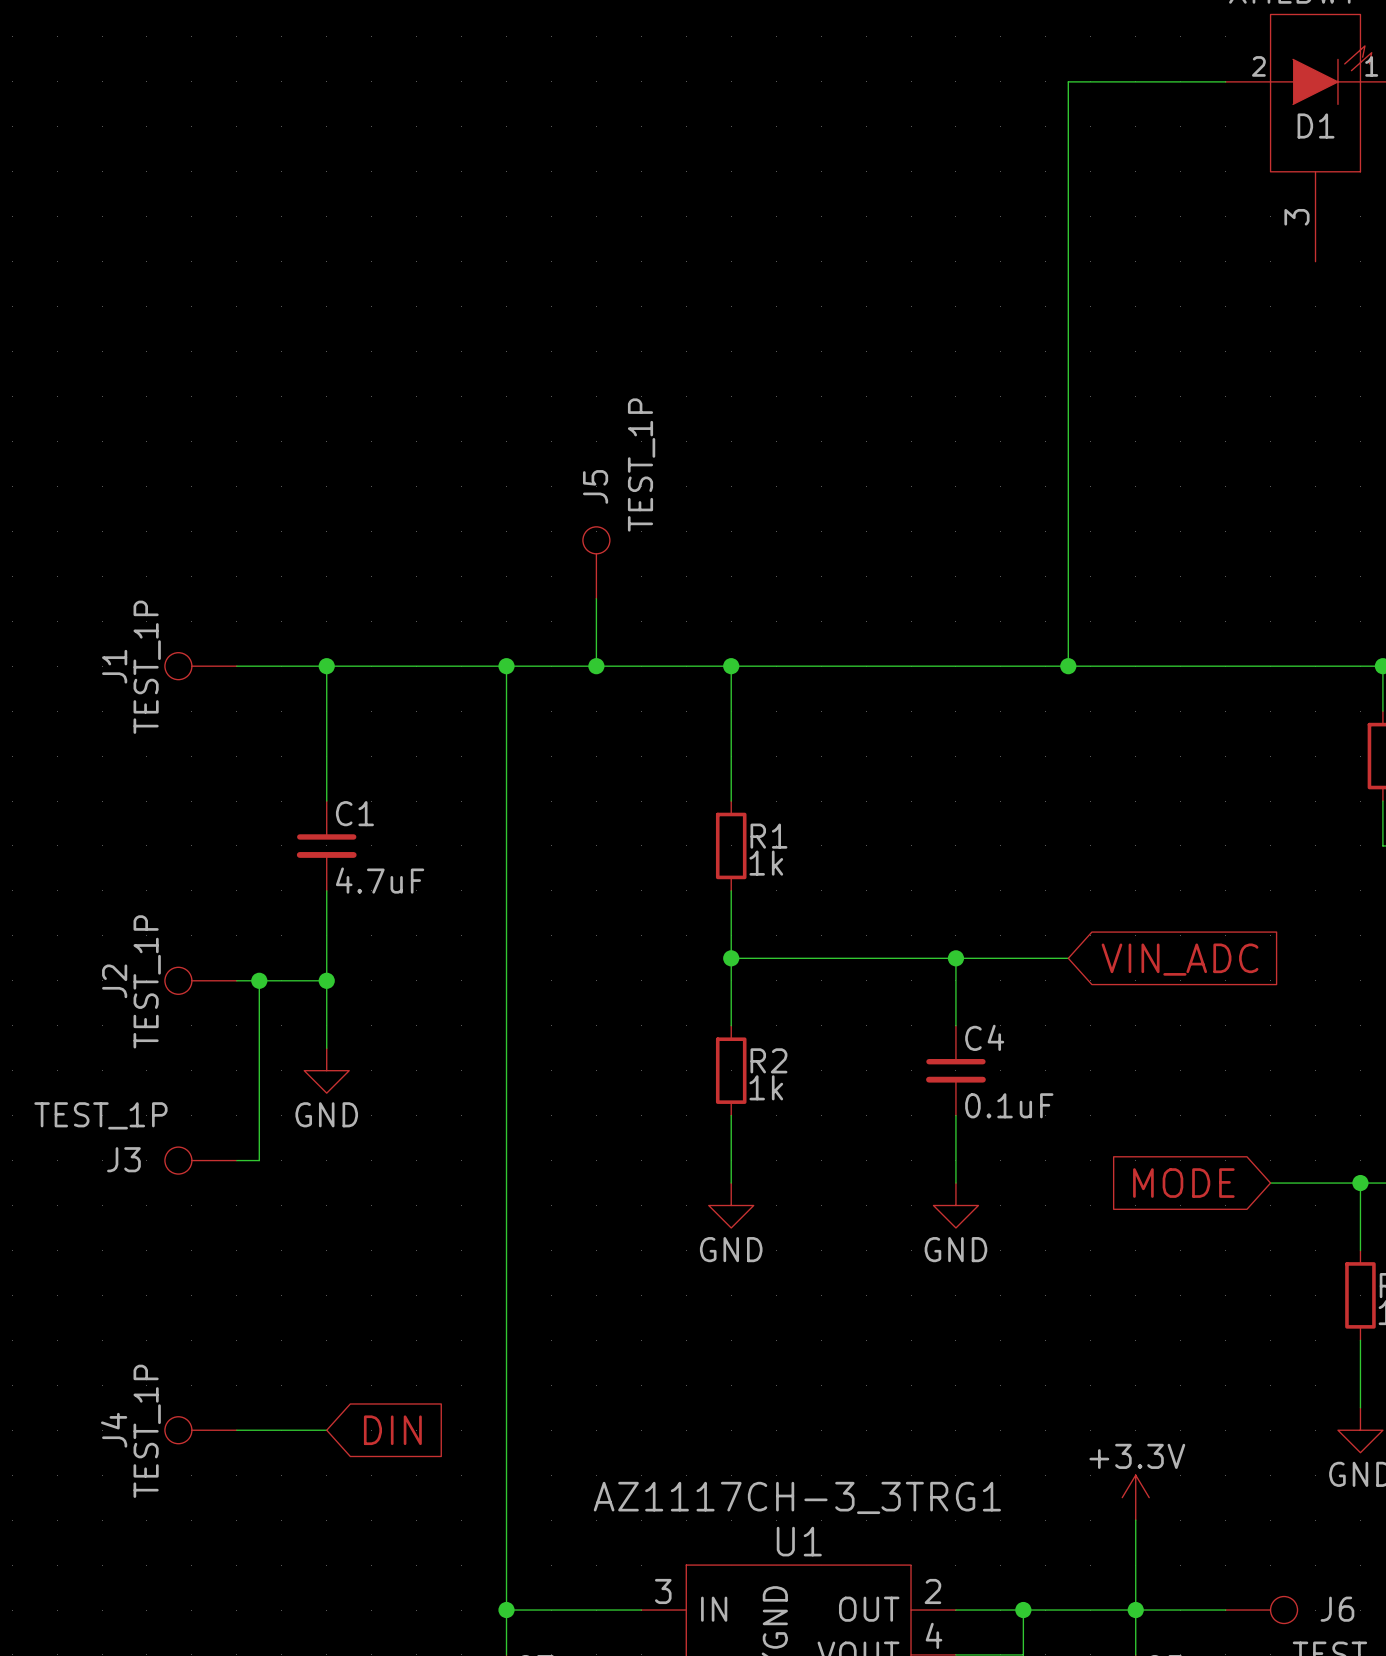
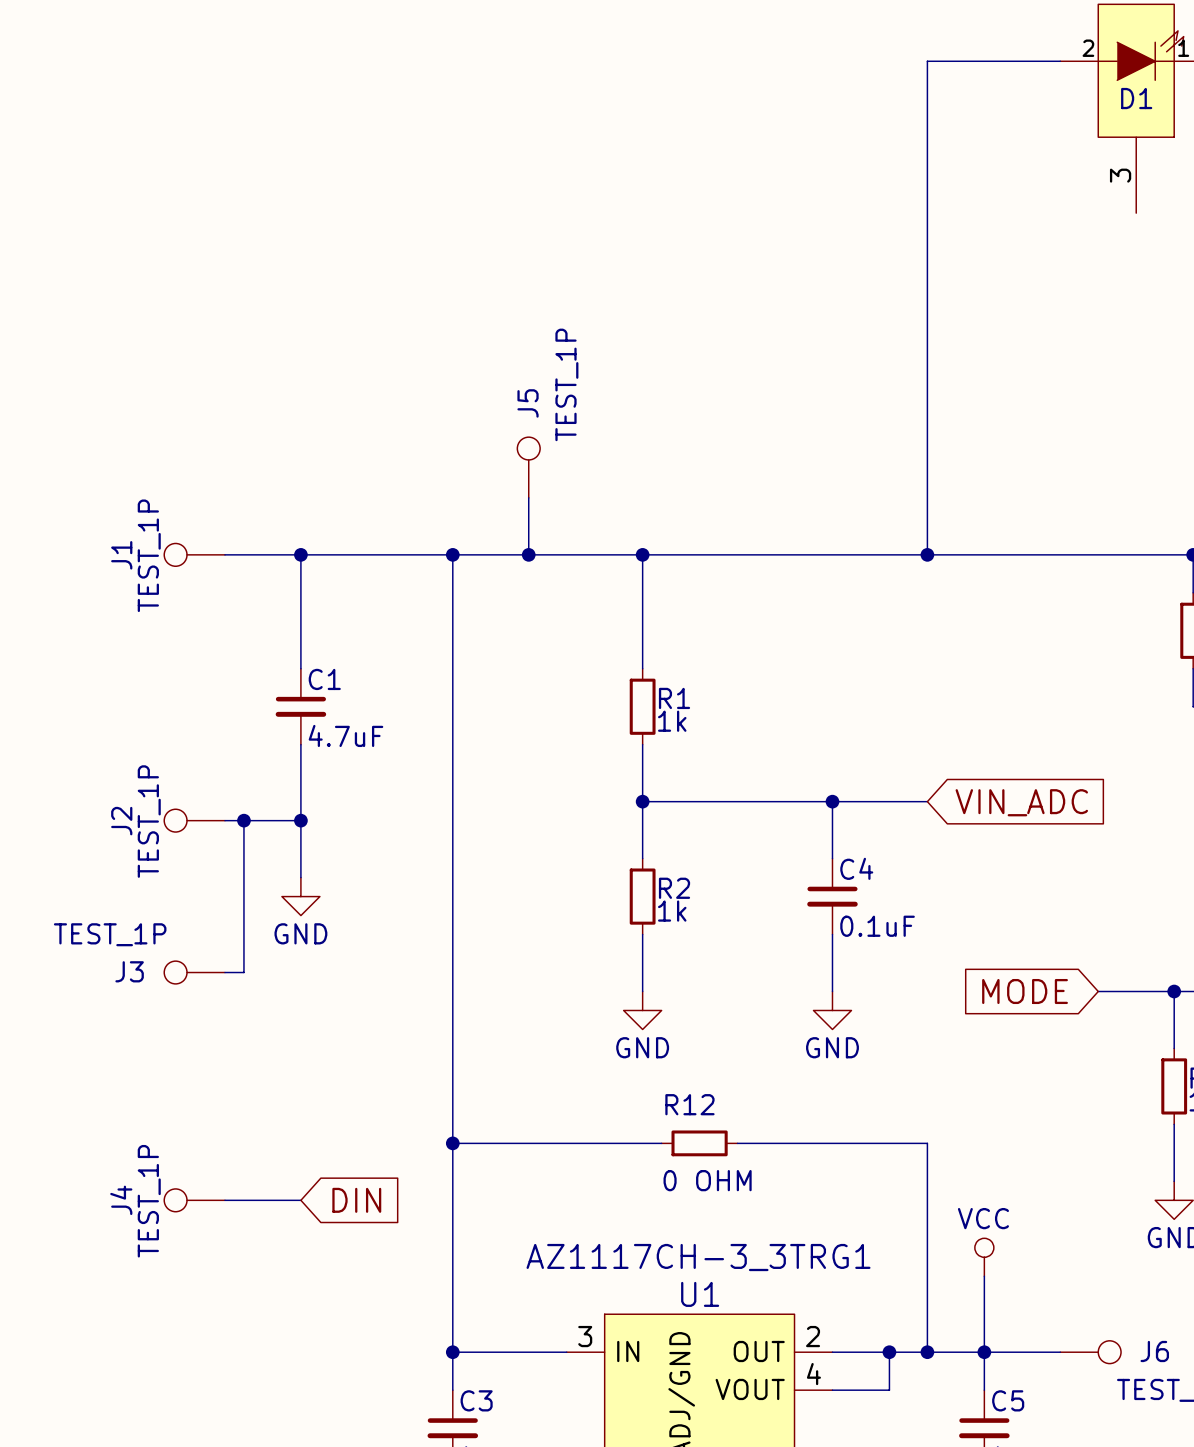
wire: none -> (452, 1143) (661, 1143)
junction: none -> (452, 1143)
R12: none -> 0 OHM (699, 1143)
wire: none -> (737, 1143) (927, 1143) (927, 1352)
power symbol: +3.3V (1135, 1497) -> VCC (984, 1257)
junction: none -> (927, 1352)

